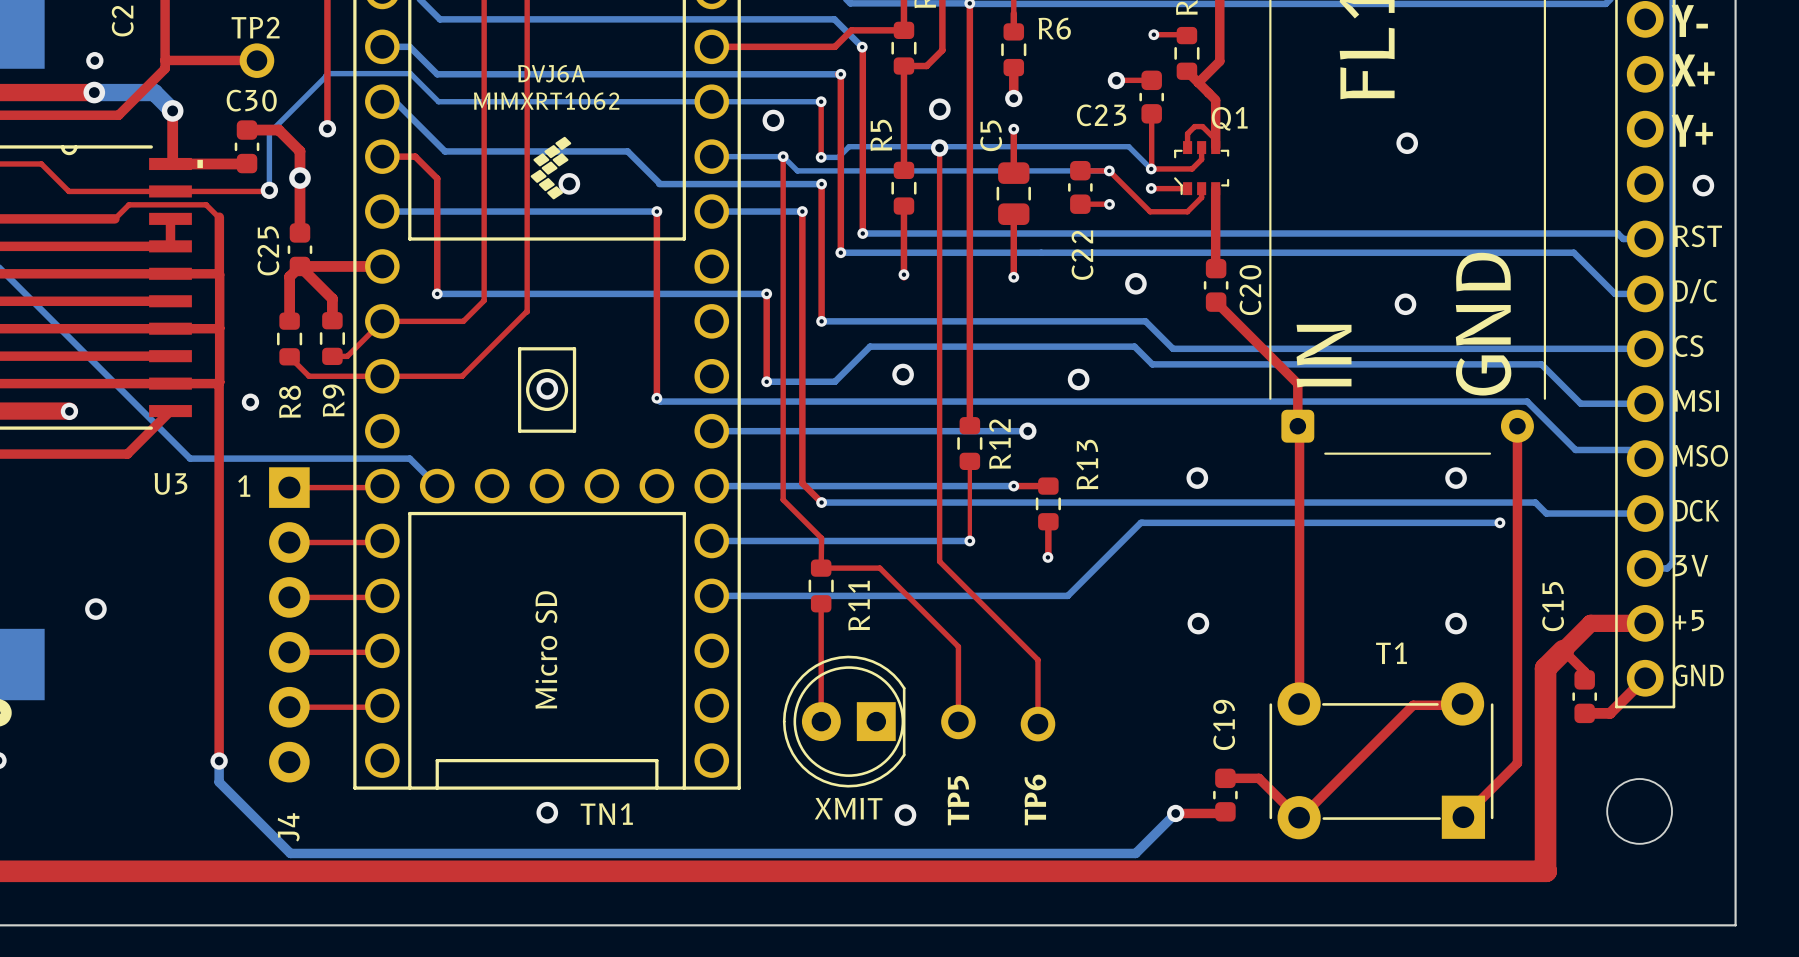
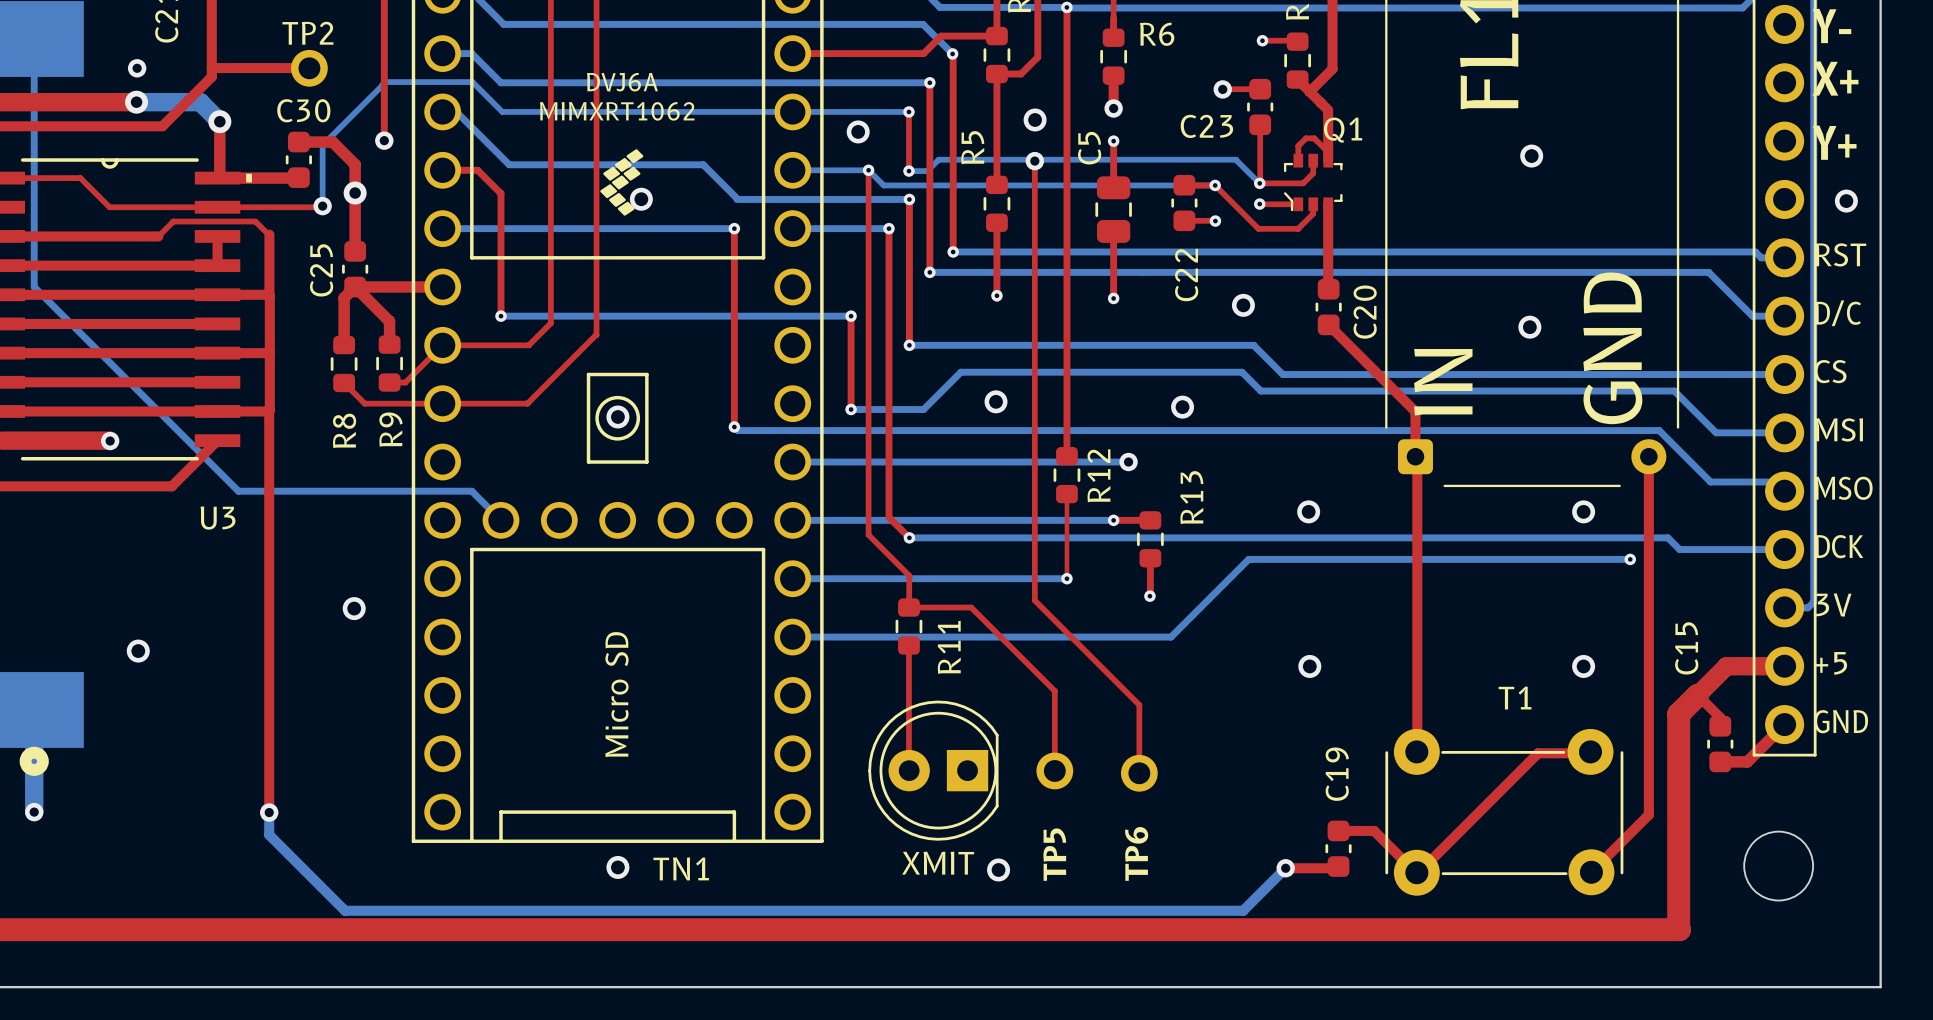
via: (250, 402) -> none
text: 1 (244, 486) -> none
top track: (382, 486) (289, 487) -> none
top track: (382, 540) (289, 542) -> none
via: none -> (354, 608)
top track: (382, 595) (289, 597) -> none
J4: (289, 624) -> none
top track: (382, 650) (289, 652) -> none
T1 footprint: [1269, 682, 1494, 840] -> [1385, 728, 1624, 896]
top track: (382, 705) (289, 707) -> none

